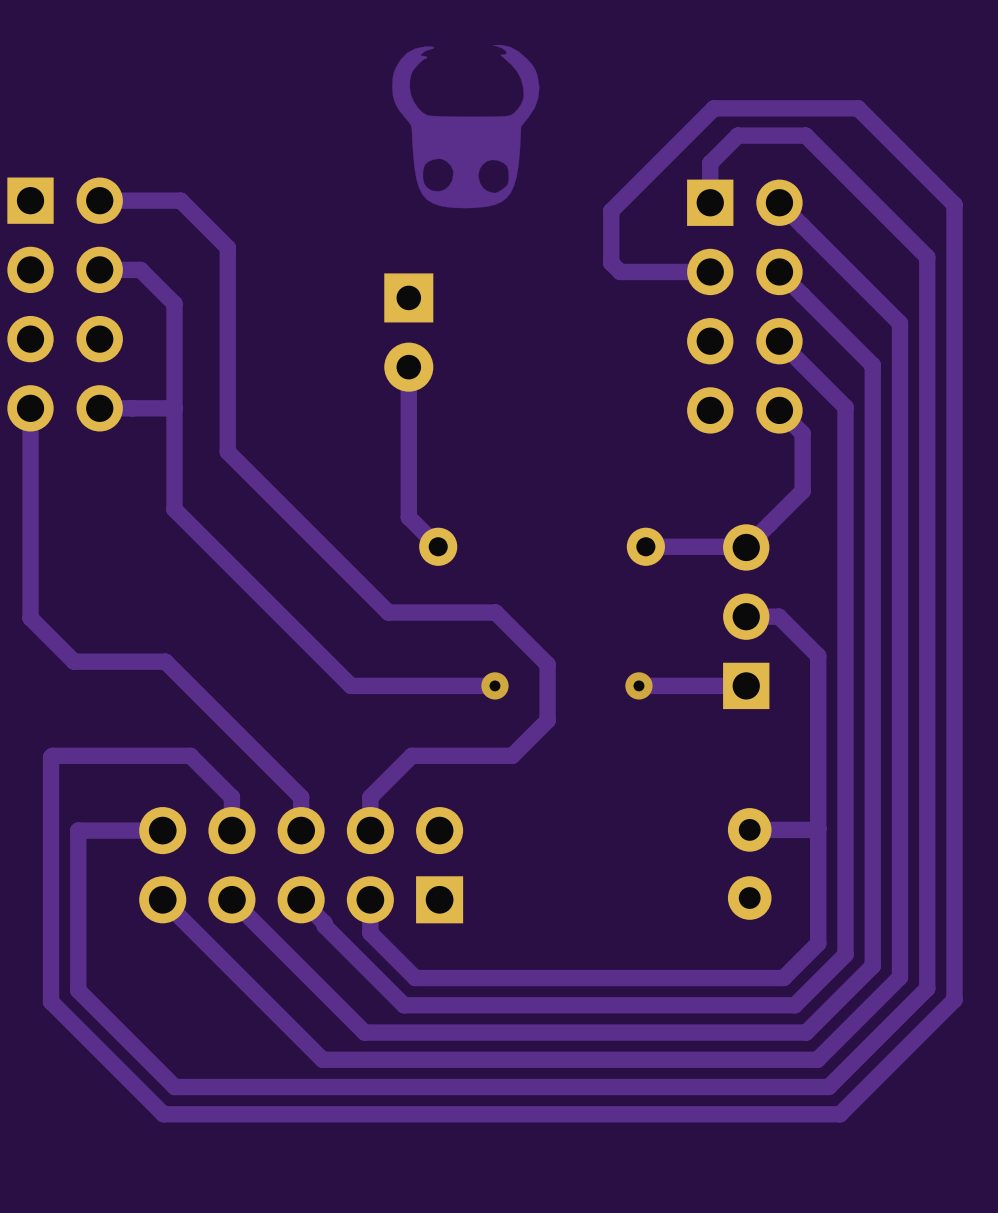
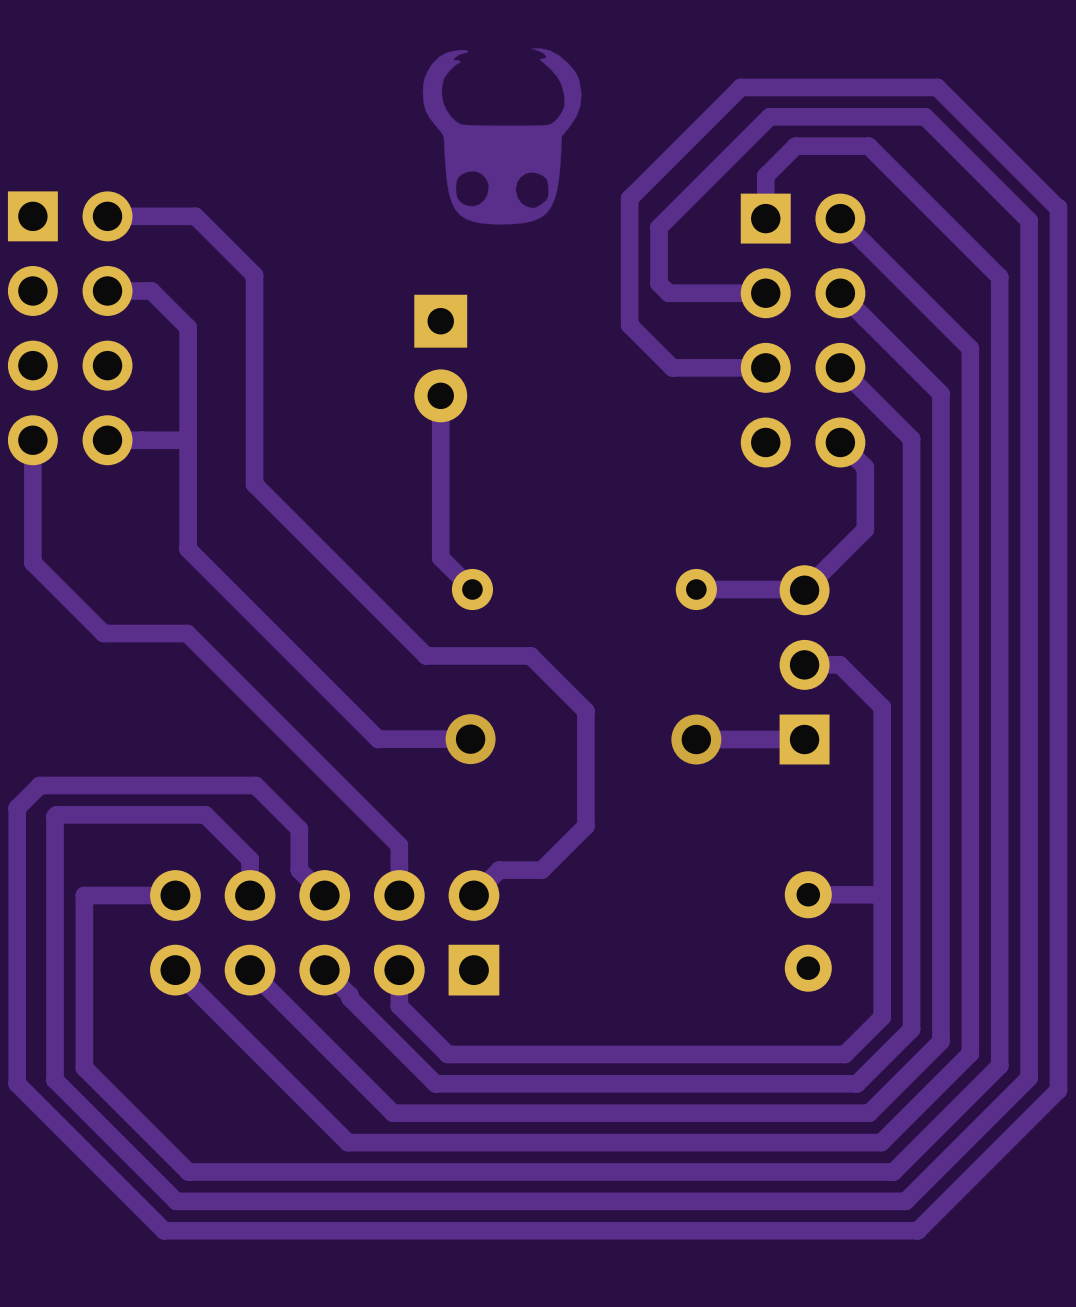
track: (180, 200) (227, 247) (227, 451) (388, 612) (495, 612) (547, 664) (547, 720) (512, 755) (411, 755) (370, 797) -> (194, 216) (254, 275) (254, 484) (426, 655) (530, 655) (585, 711) (585, 826) (541, 870) (499, 870) (473, 895)
track: none -> (765, 367) (672, 367) (629, 325) (629, 198) (740, 87) (937, 87) (1058, 207) (1058, 1090) (917, 1230) (164, 1230) (17, 1083) (17, 808) (39, 785) (255, 785) (299, 829) (299, 870) (324, 895)
track: (30, 521) (30, 618) (74, 661) (165, 661) (301, 797) (301, 830) -> (32, 562) (103, 633) (187, 633) (399, 845) (399, 859)
via size: [625, 672, 653, 700] -> [671, 714, 722, 765]
via: none -> (470, 739)
track: (494, 685) (351, 685) -> (470, 739) (378, 739)
via: (494, 685) -> none

